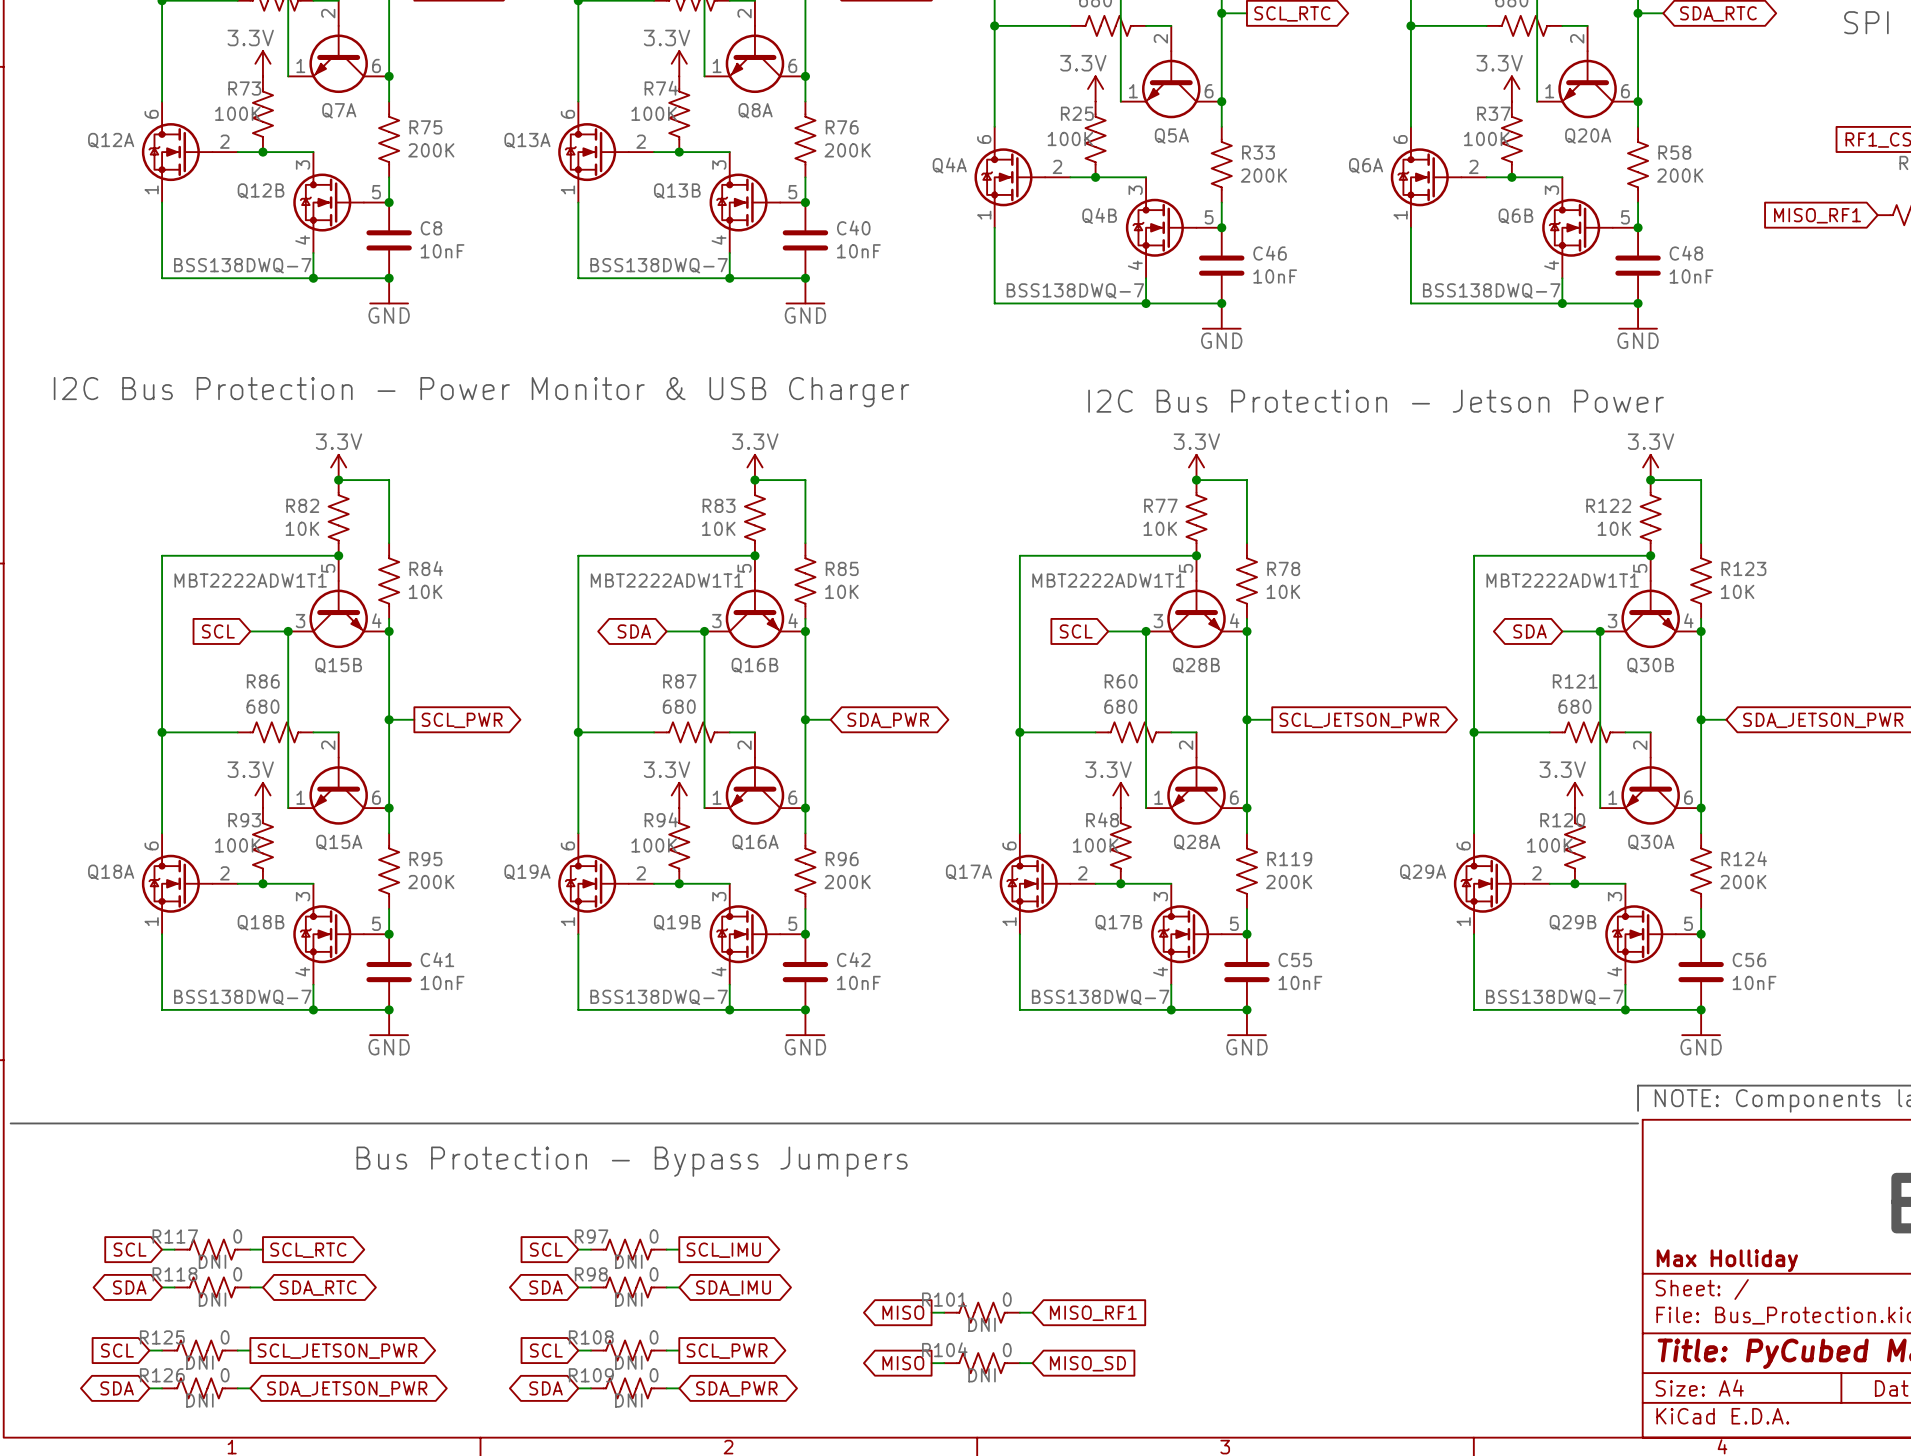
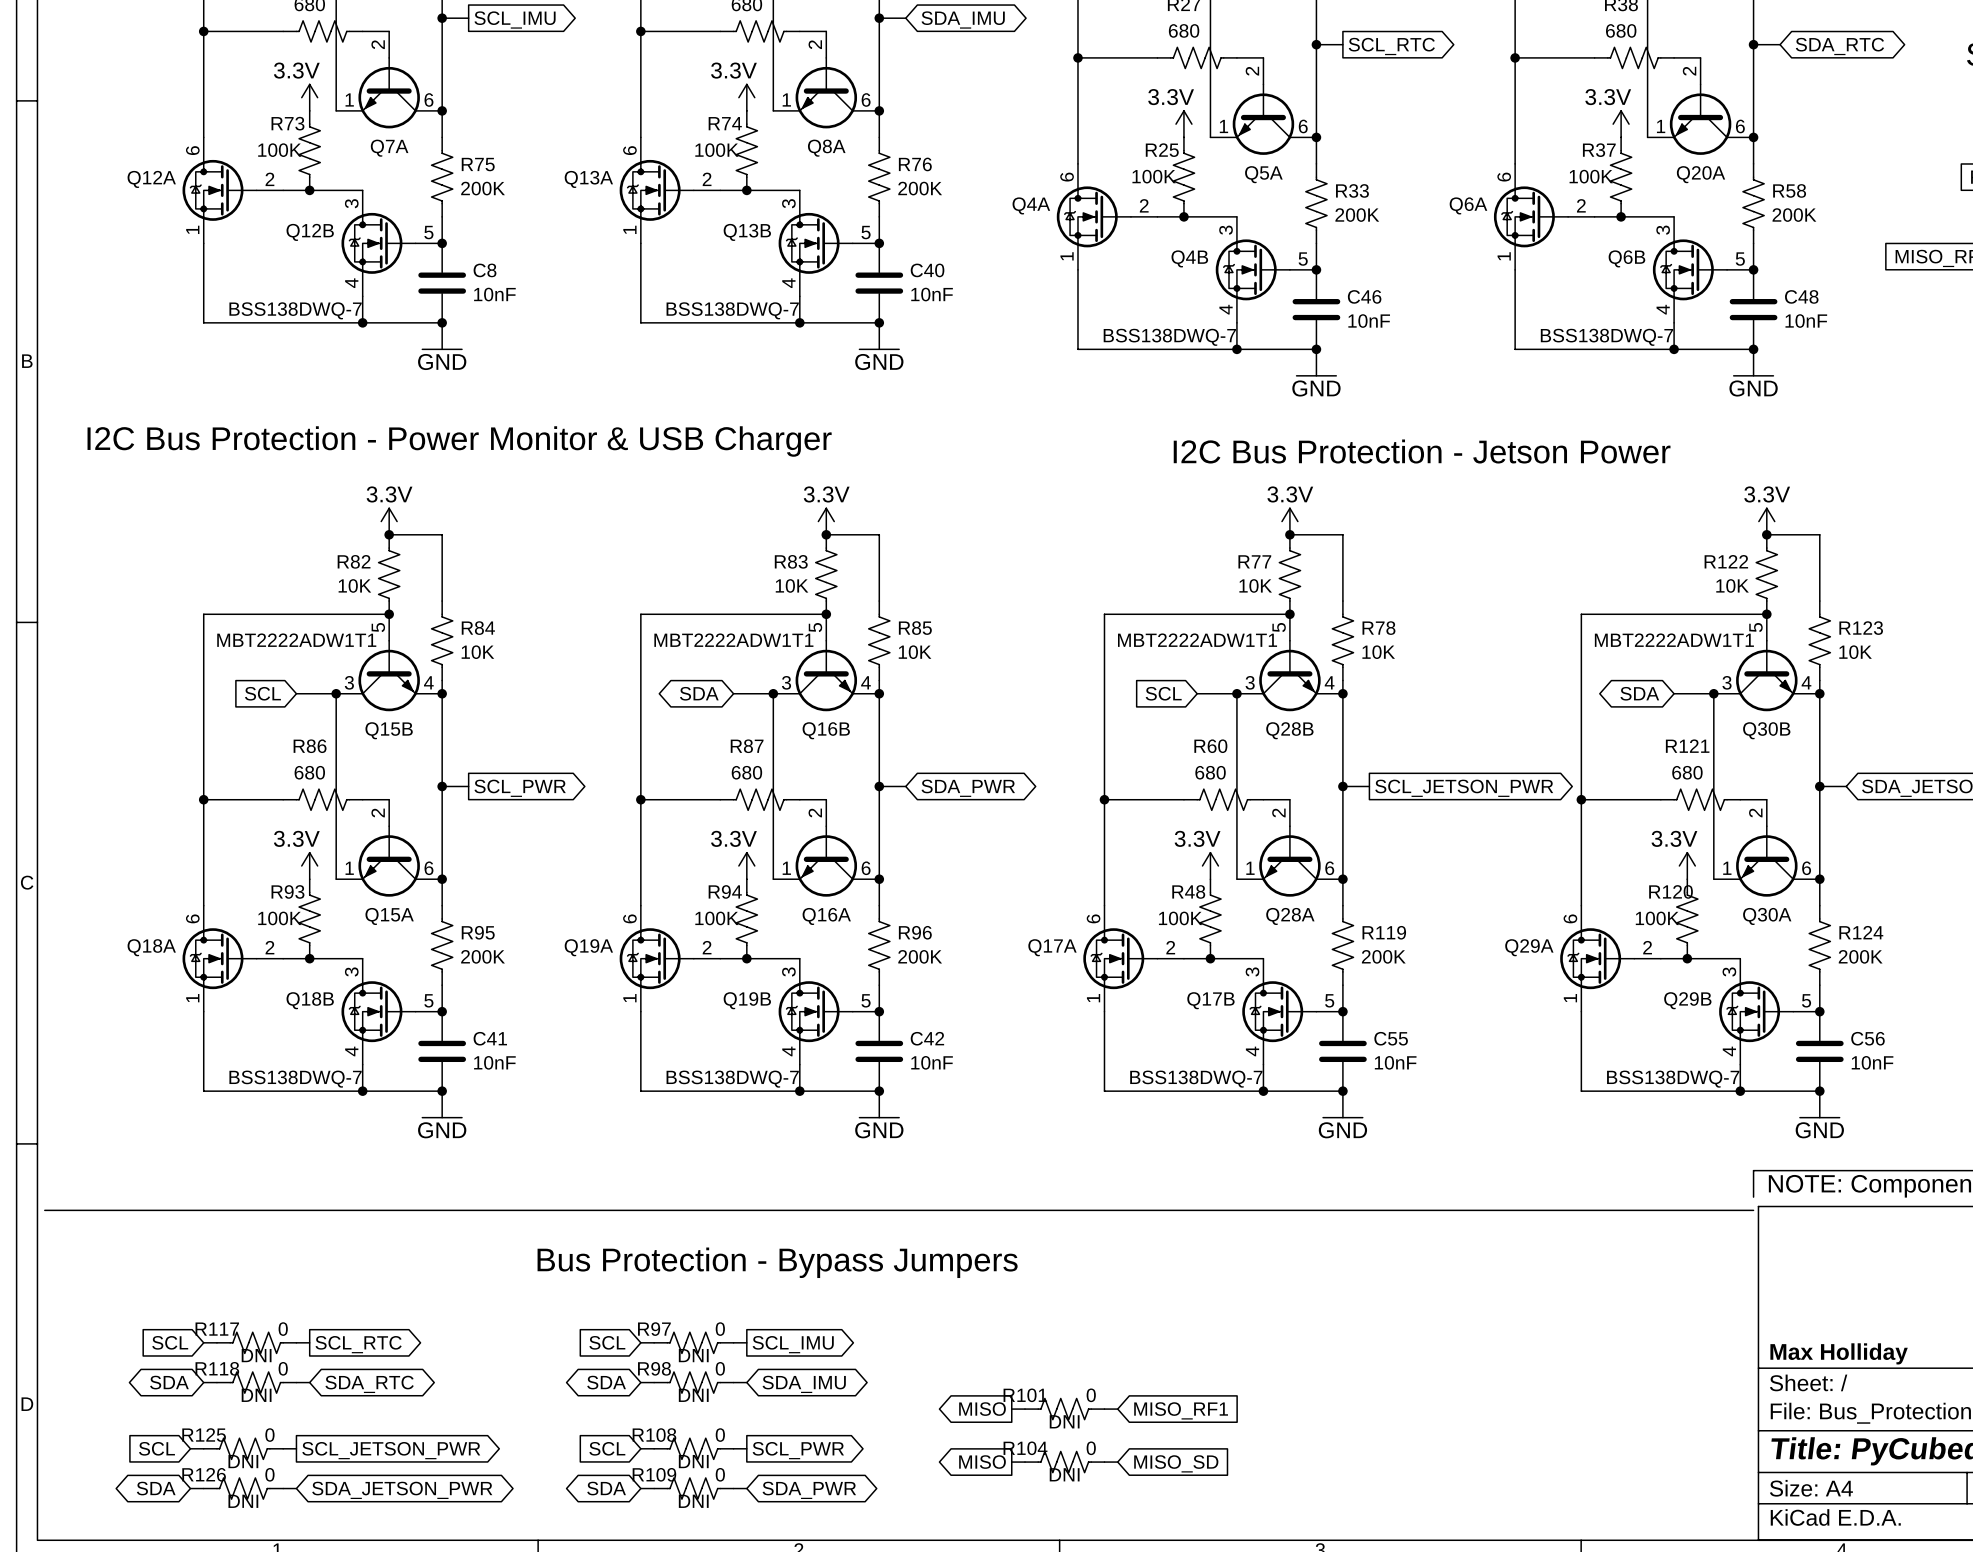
text position: Bus Protection - Bypass Jumpers (632, 1161) -> Bus Protection - Bypass Jumpers (777, 1262)

